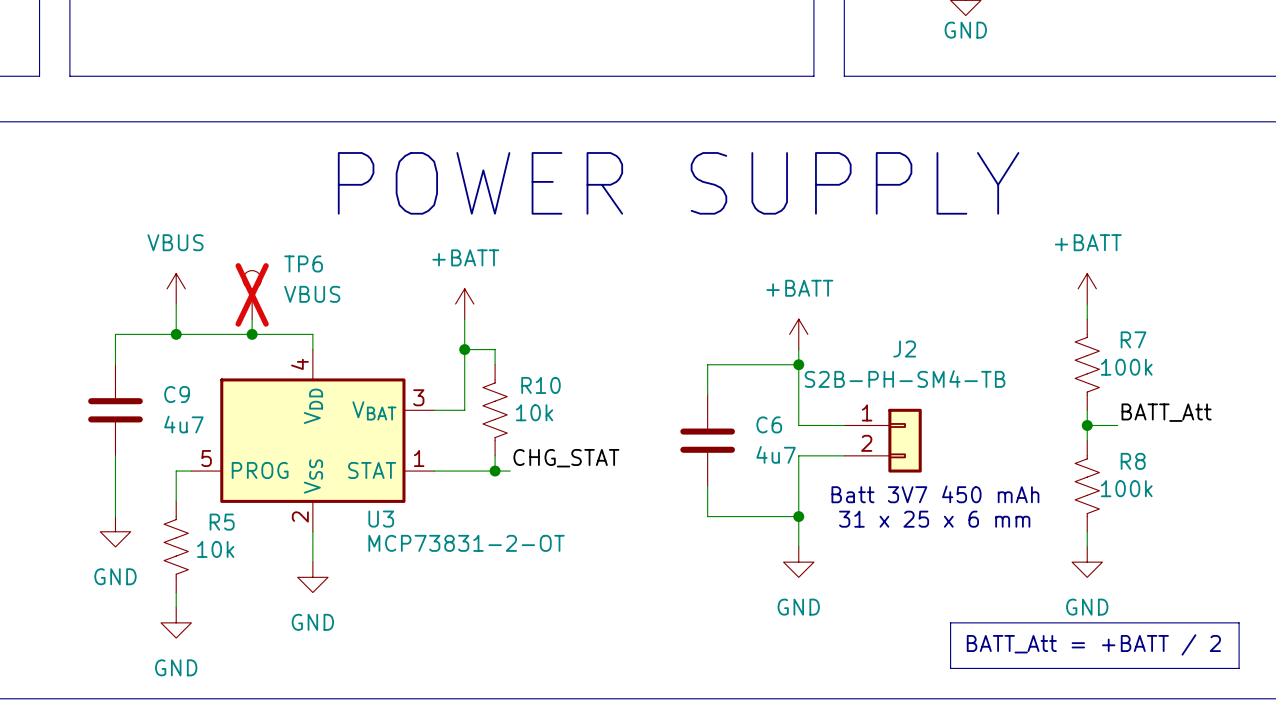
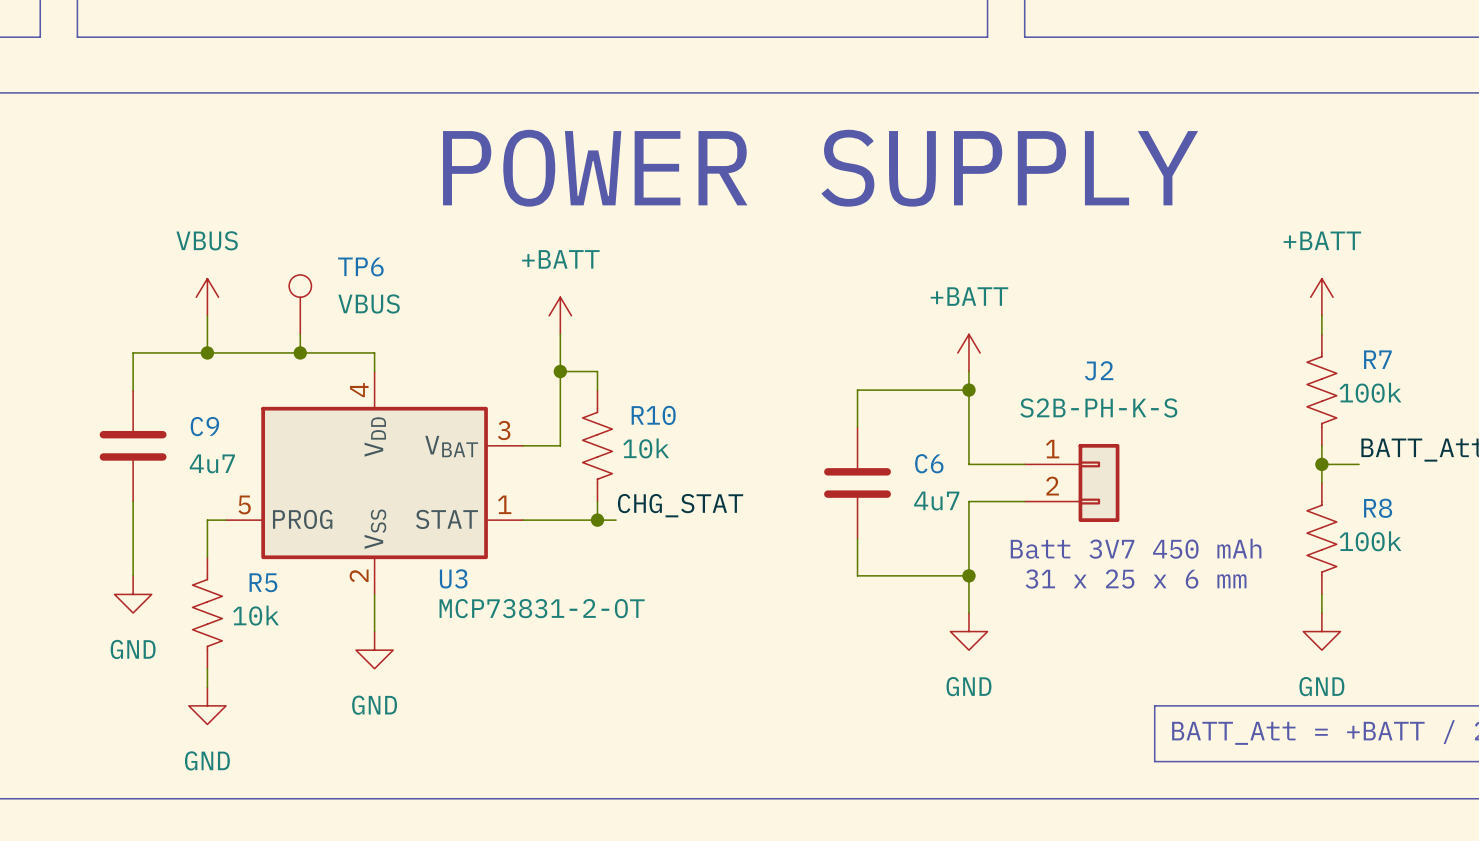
TP6 do-not-place cross: (252, 294) -> none
J2 value: S2B-PH-SM4-TB (905, 379) -> S2B-PH-K-S (1098, 407)

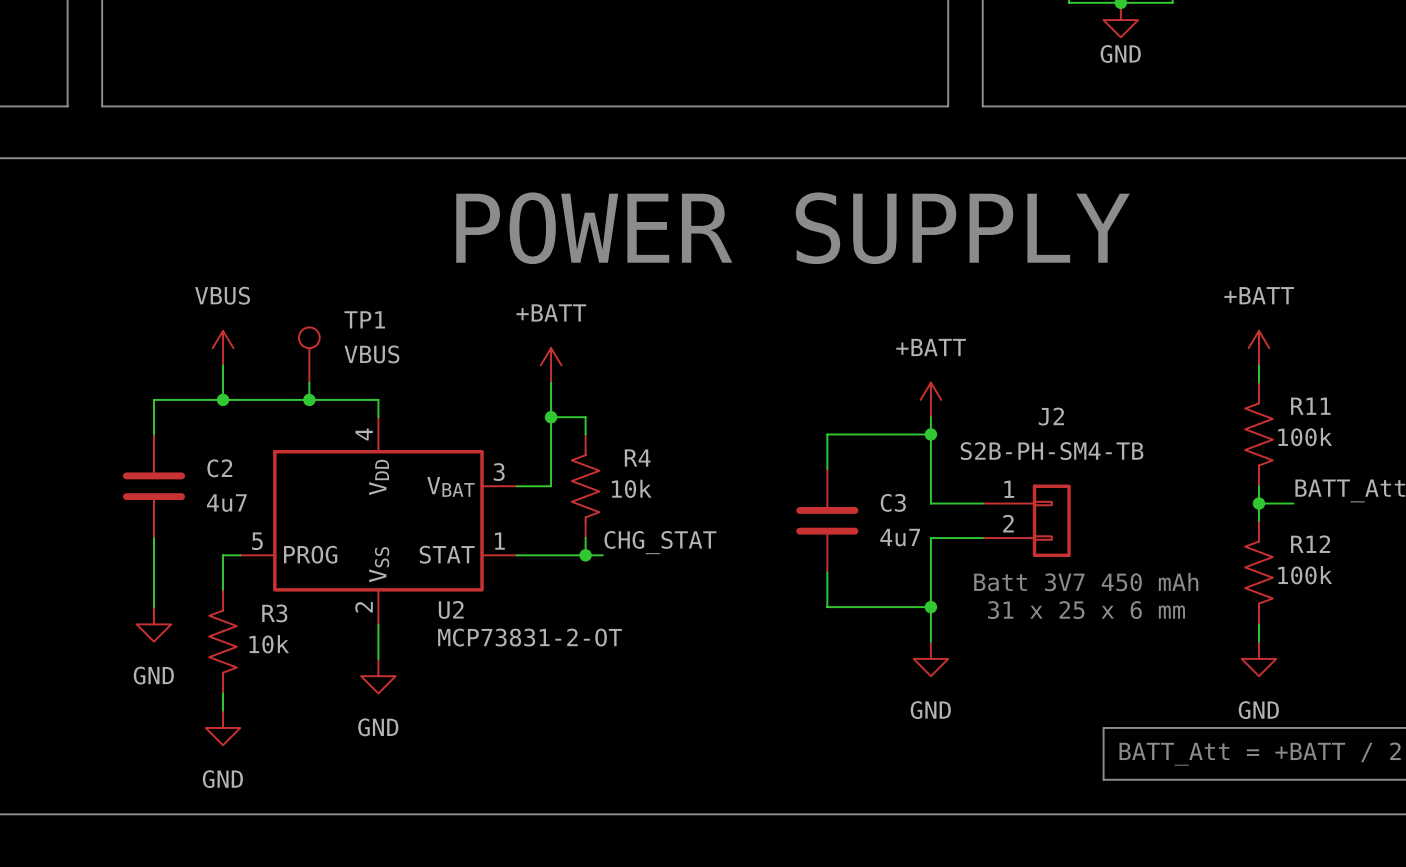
TP6 name: TP6 (360, 266) -> TP1 (364, 319)
R7 name: R7 (1377, 359) -> R11 (1310, 406)
J2 value: S2B-PH-K-S (1098, 407) -> S2B-PH-SM4-TB (1052, 451)
R10 name: R10 (653, 415) -> R4 (637, 457)
C9 name: C9 (204, 426) -> C2 (219, 468)
C6 name: C6 (929, 463) -> C3 (893, 502)
R8 name: R8 (1378, 508) -> R12 (1310, 544)
U3 name: U3 (453, 578) -> U2 (451, 609)
R5 name: R5 (263, 582) -> R3 (274, 613)

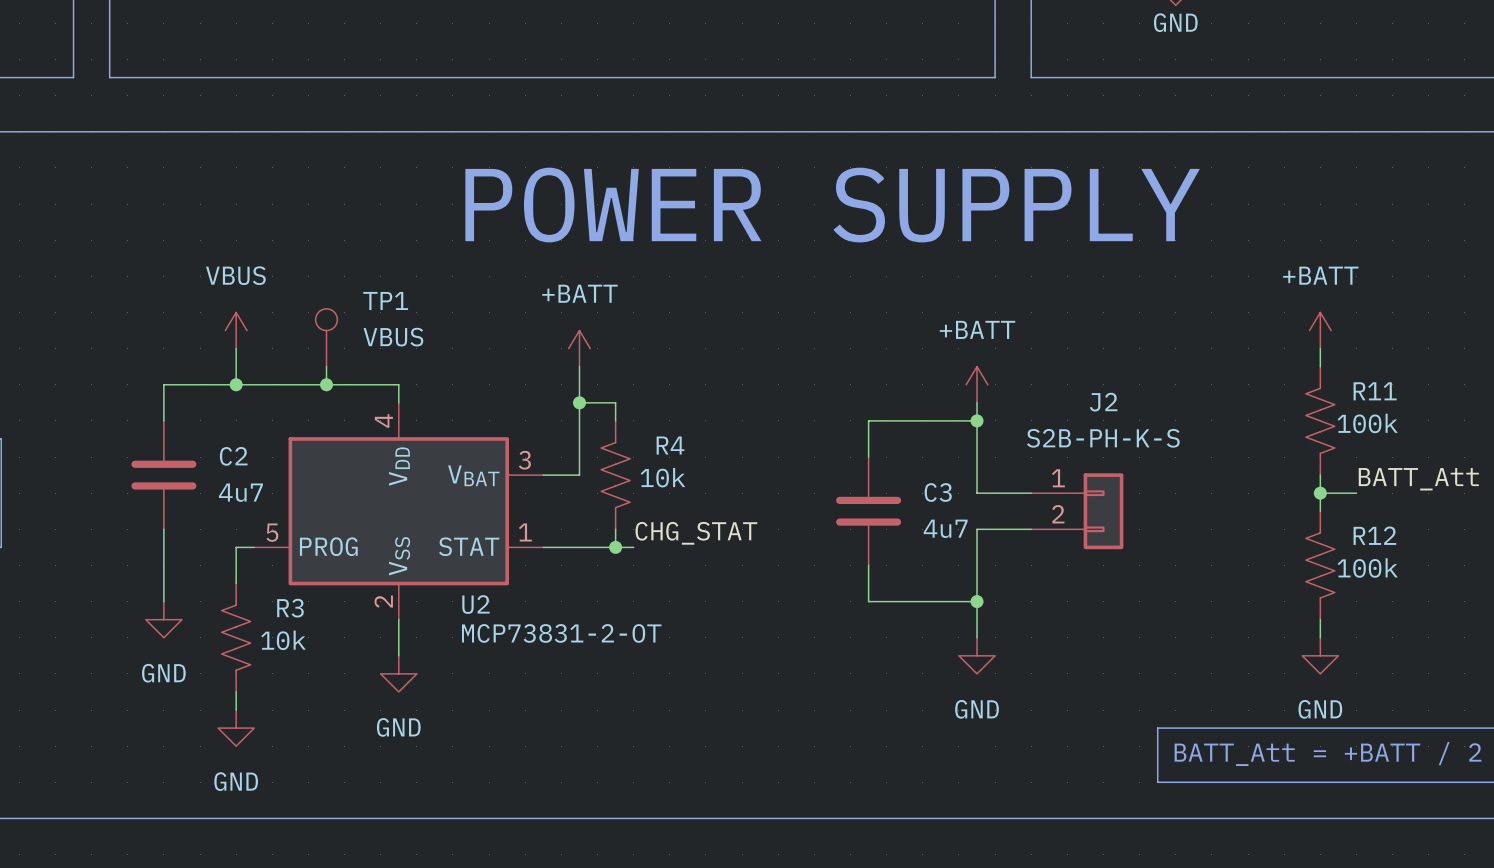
J2 value: S2B-PH-SM4-TB (1052, 451) -> S2B-PH-K-S (1103, 438)
text: Batt 3V7 450 mAh (1086, 582) -> none
text: 31 x 25 x 6 mm (1086, 610) -> none

